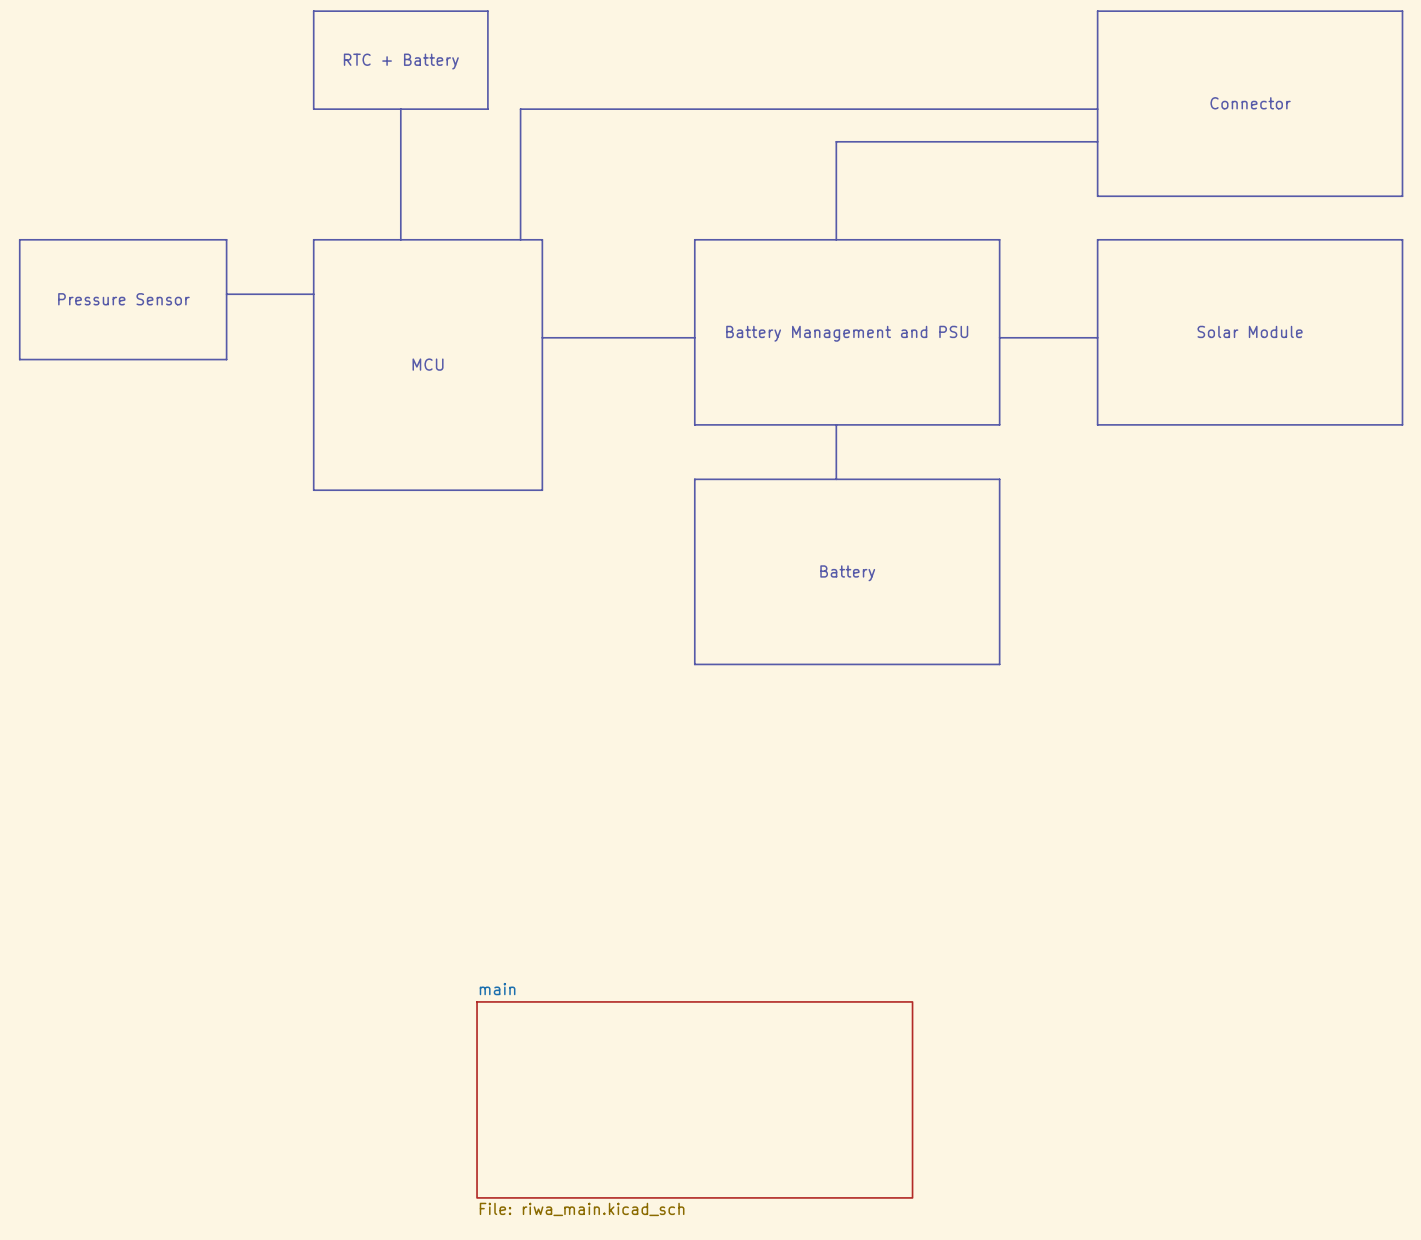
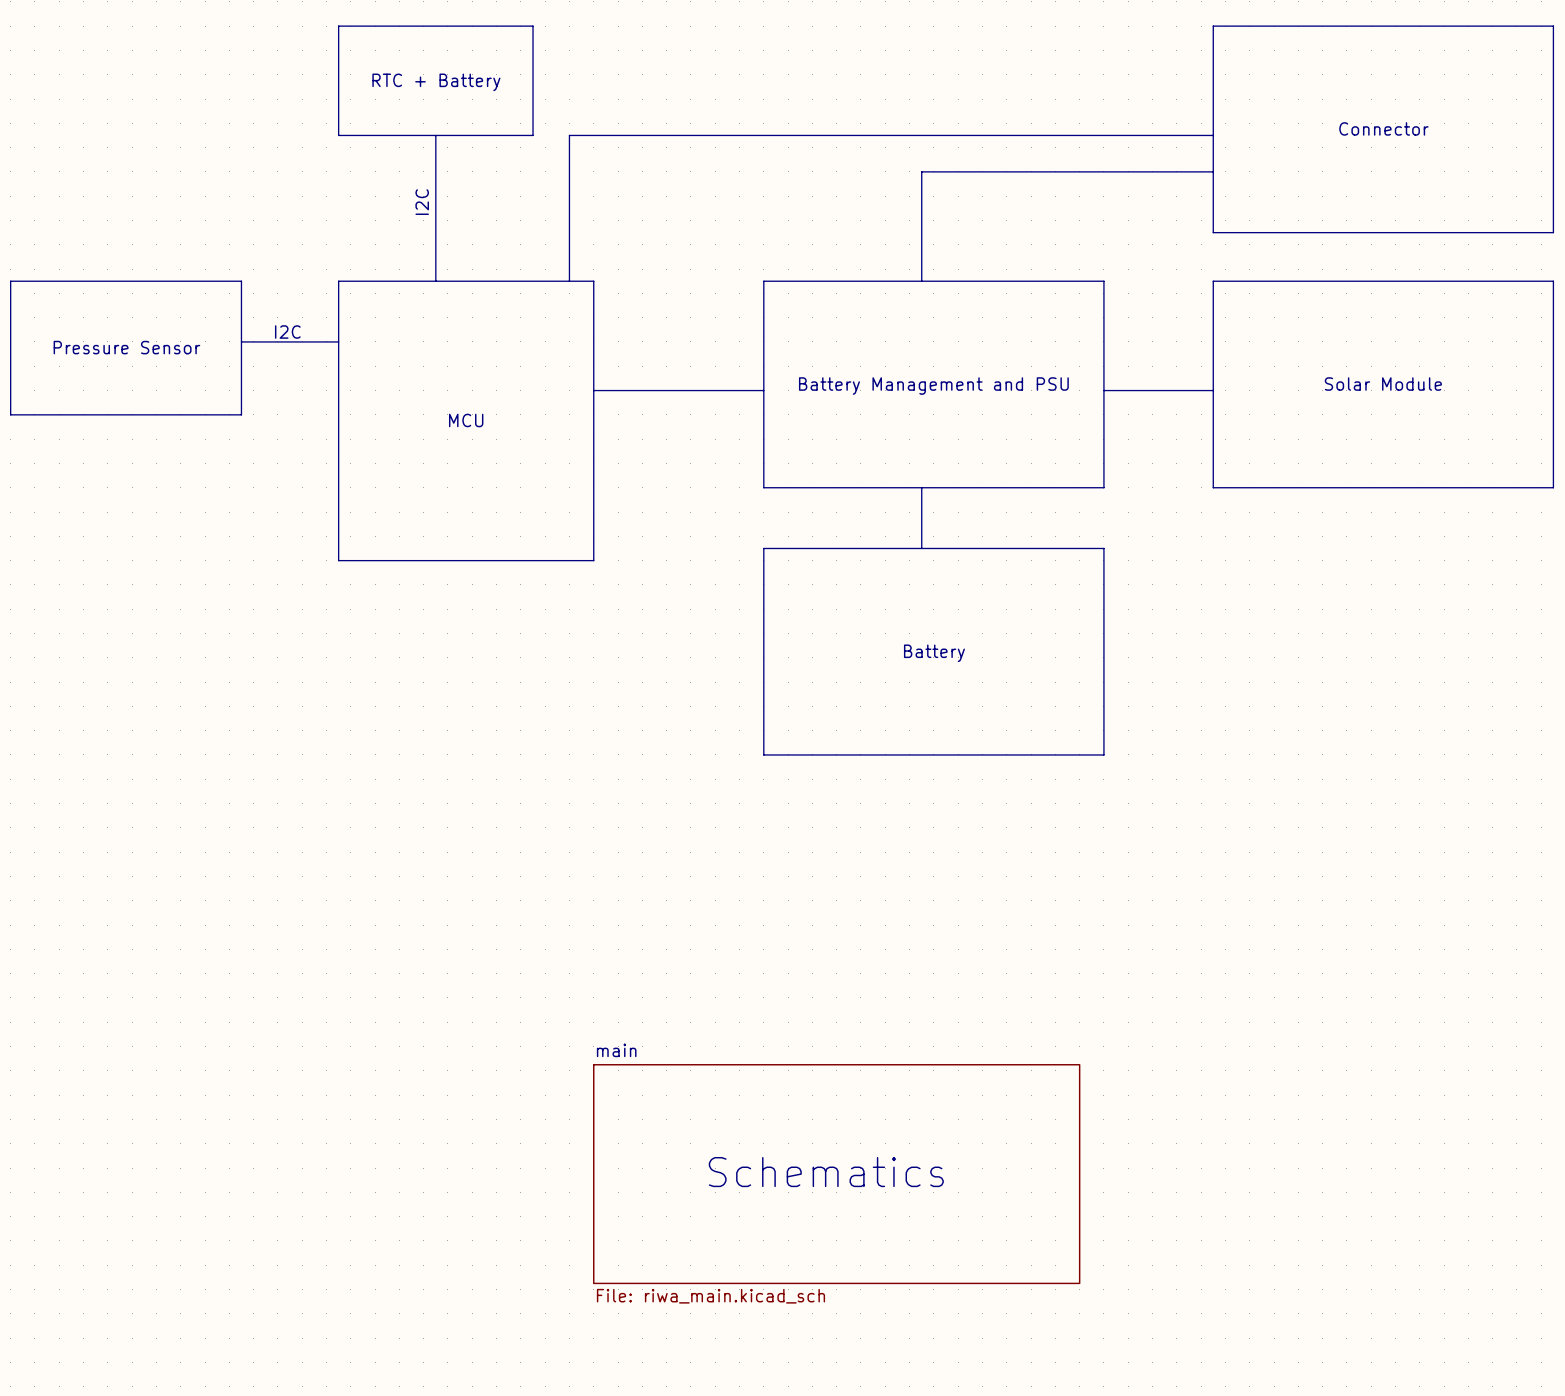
text: none -> I2C (422, 202)
text: none -> I2C (287, 332)
text: none -> Schematics (826, 1172)
sheet main position: (694, 1099) -> (836, 1174)

